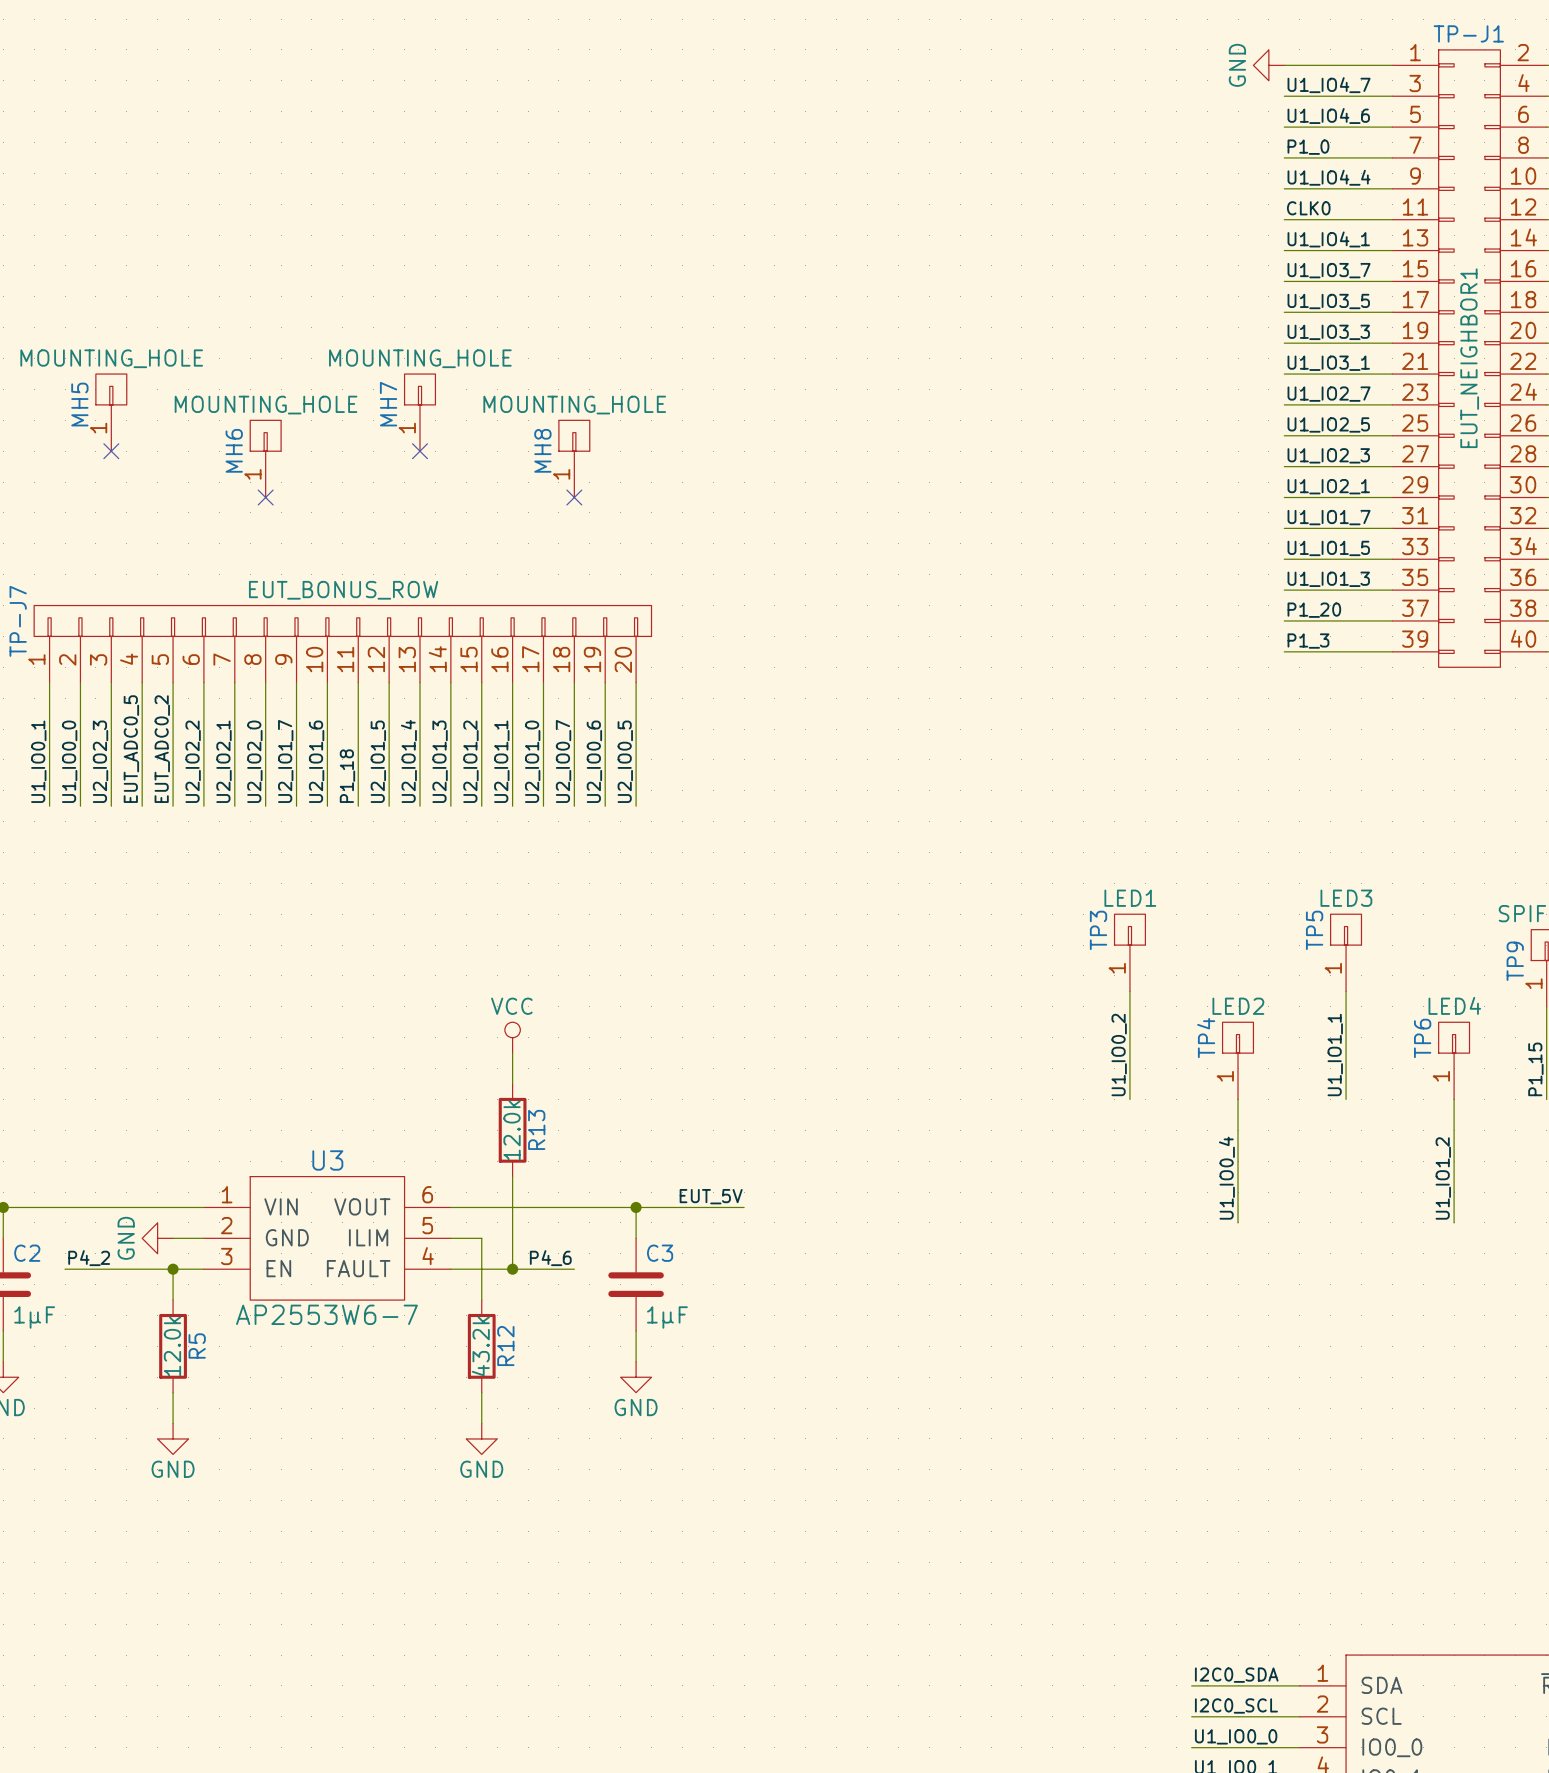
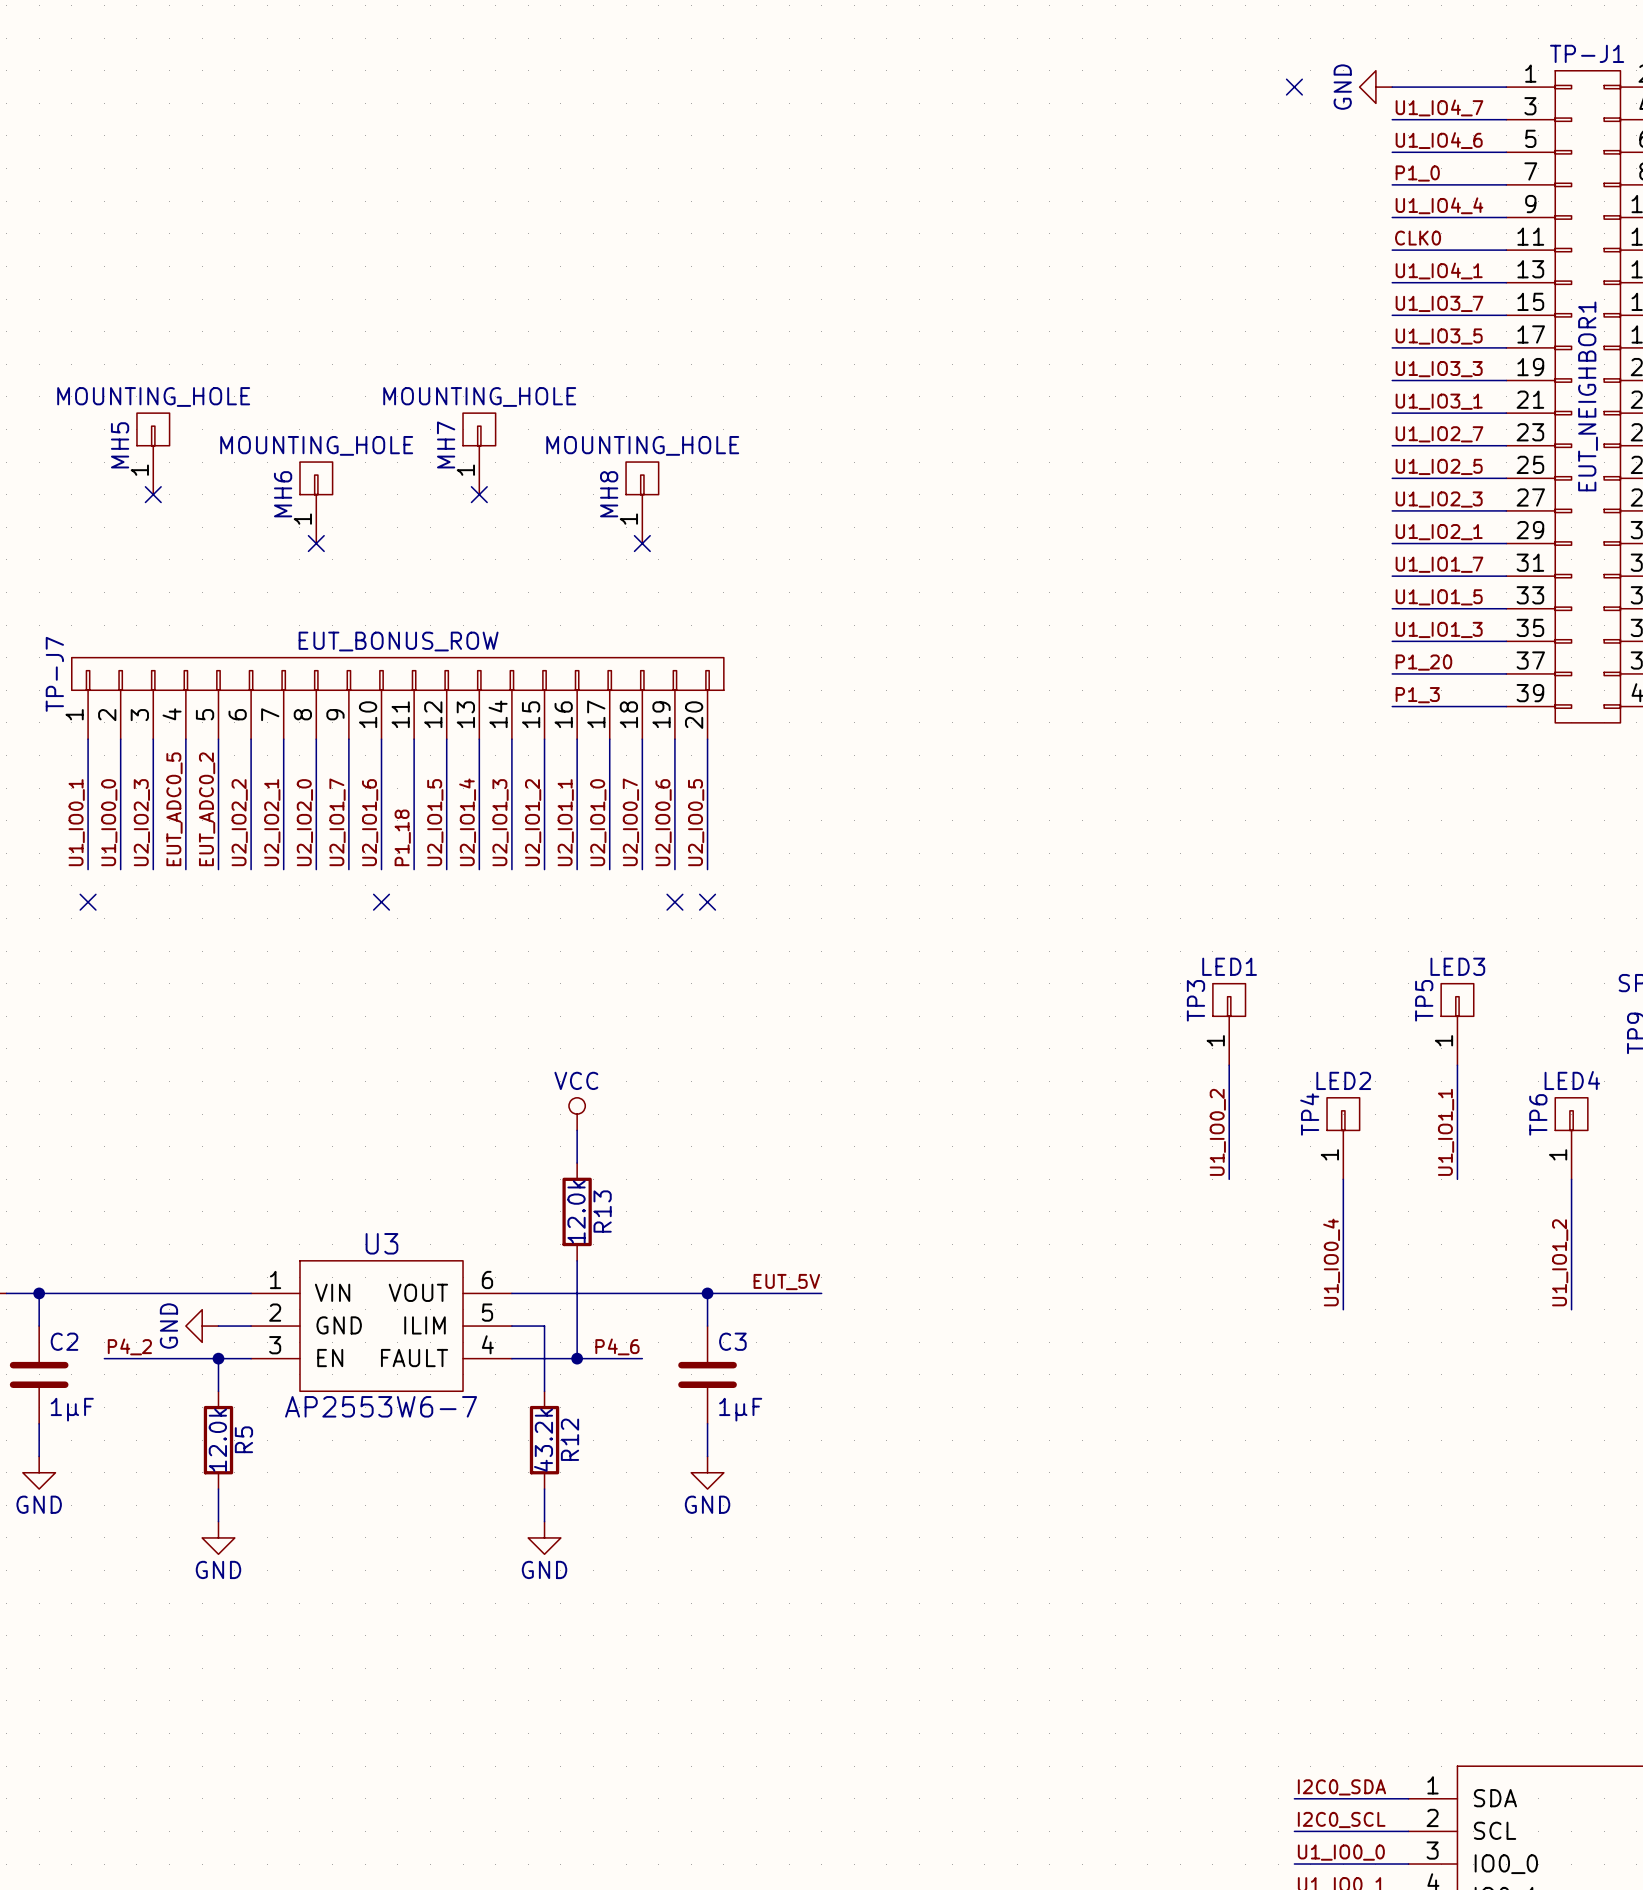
no-connect mark: none -> (1294, 87)
no-connect mark: none -> (88, 902)
no-connect mark: none -> (381, 902)
no-connect mark: none -> (674, 902)
no-connect mark: none -> (707, 902)

